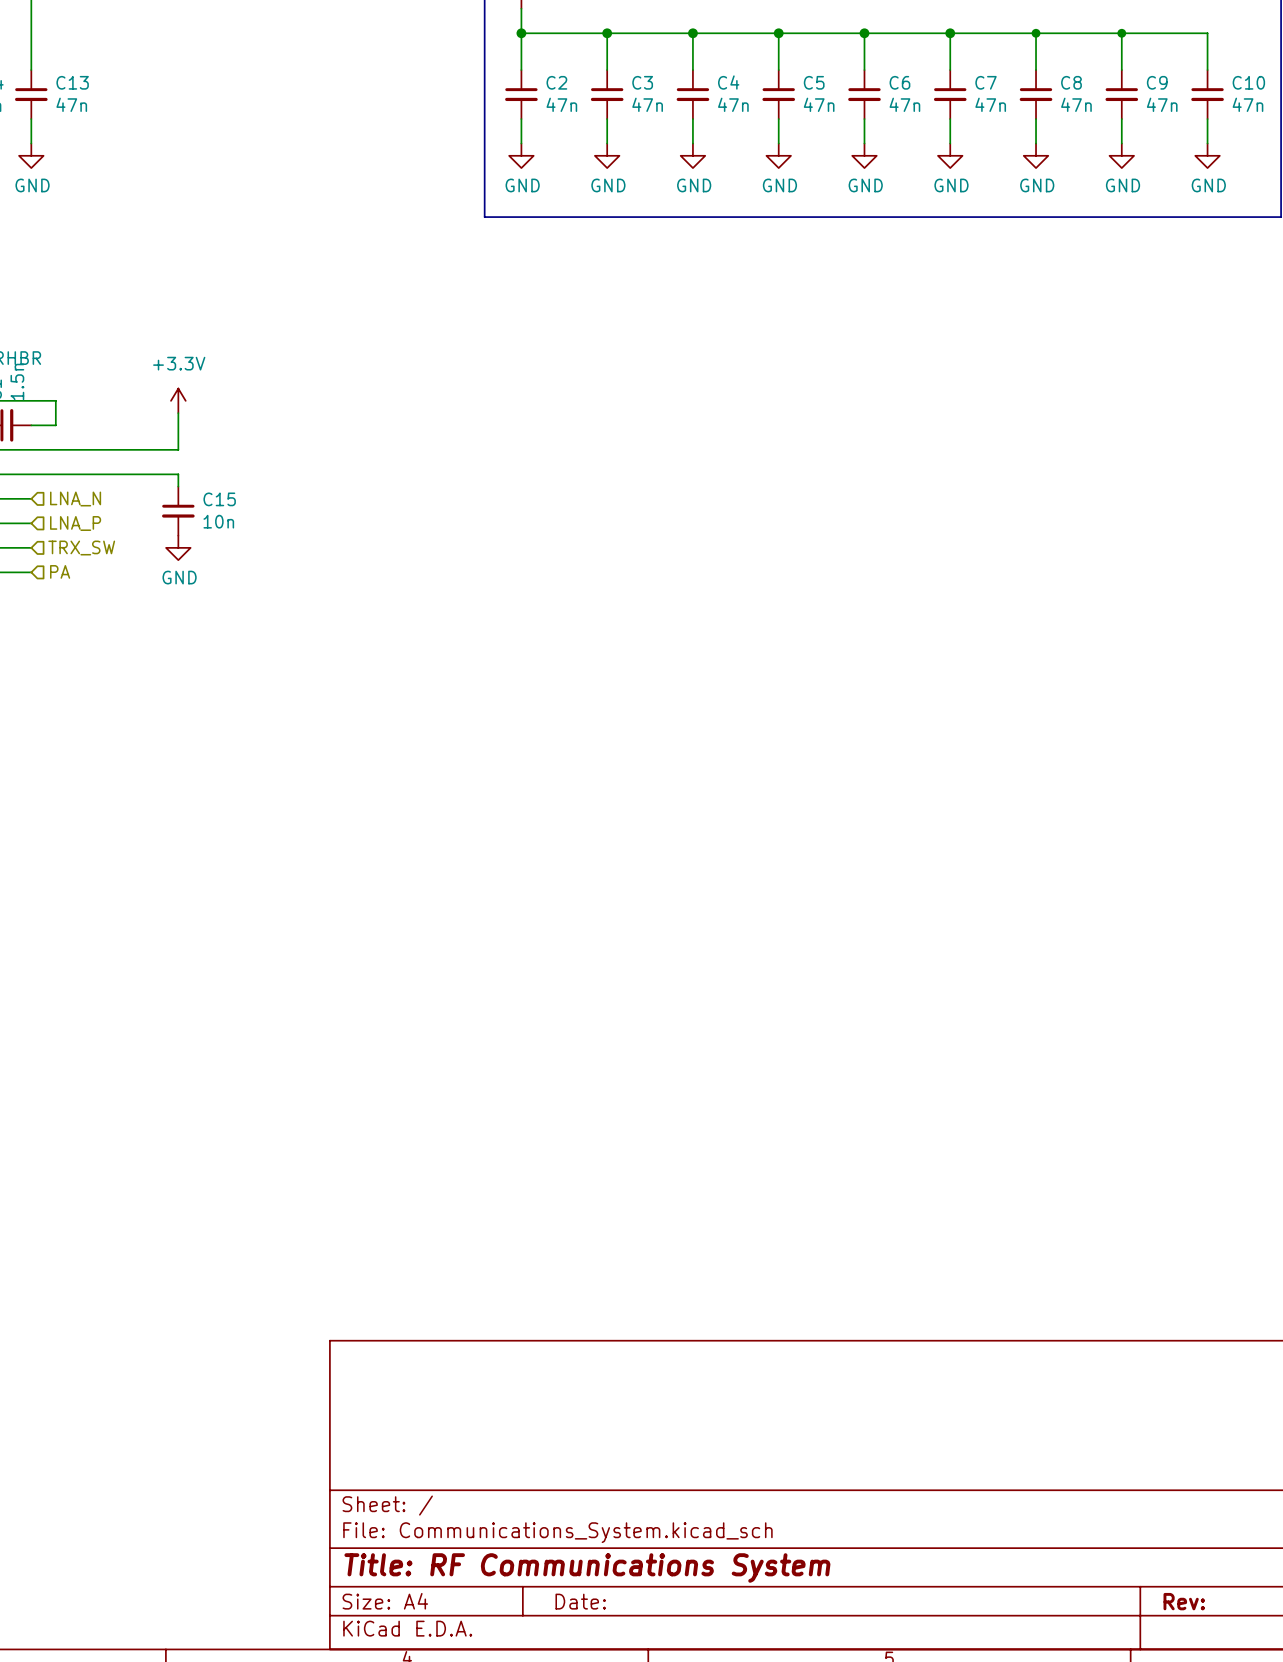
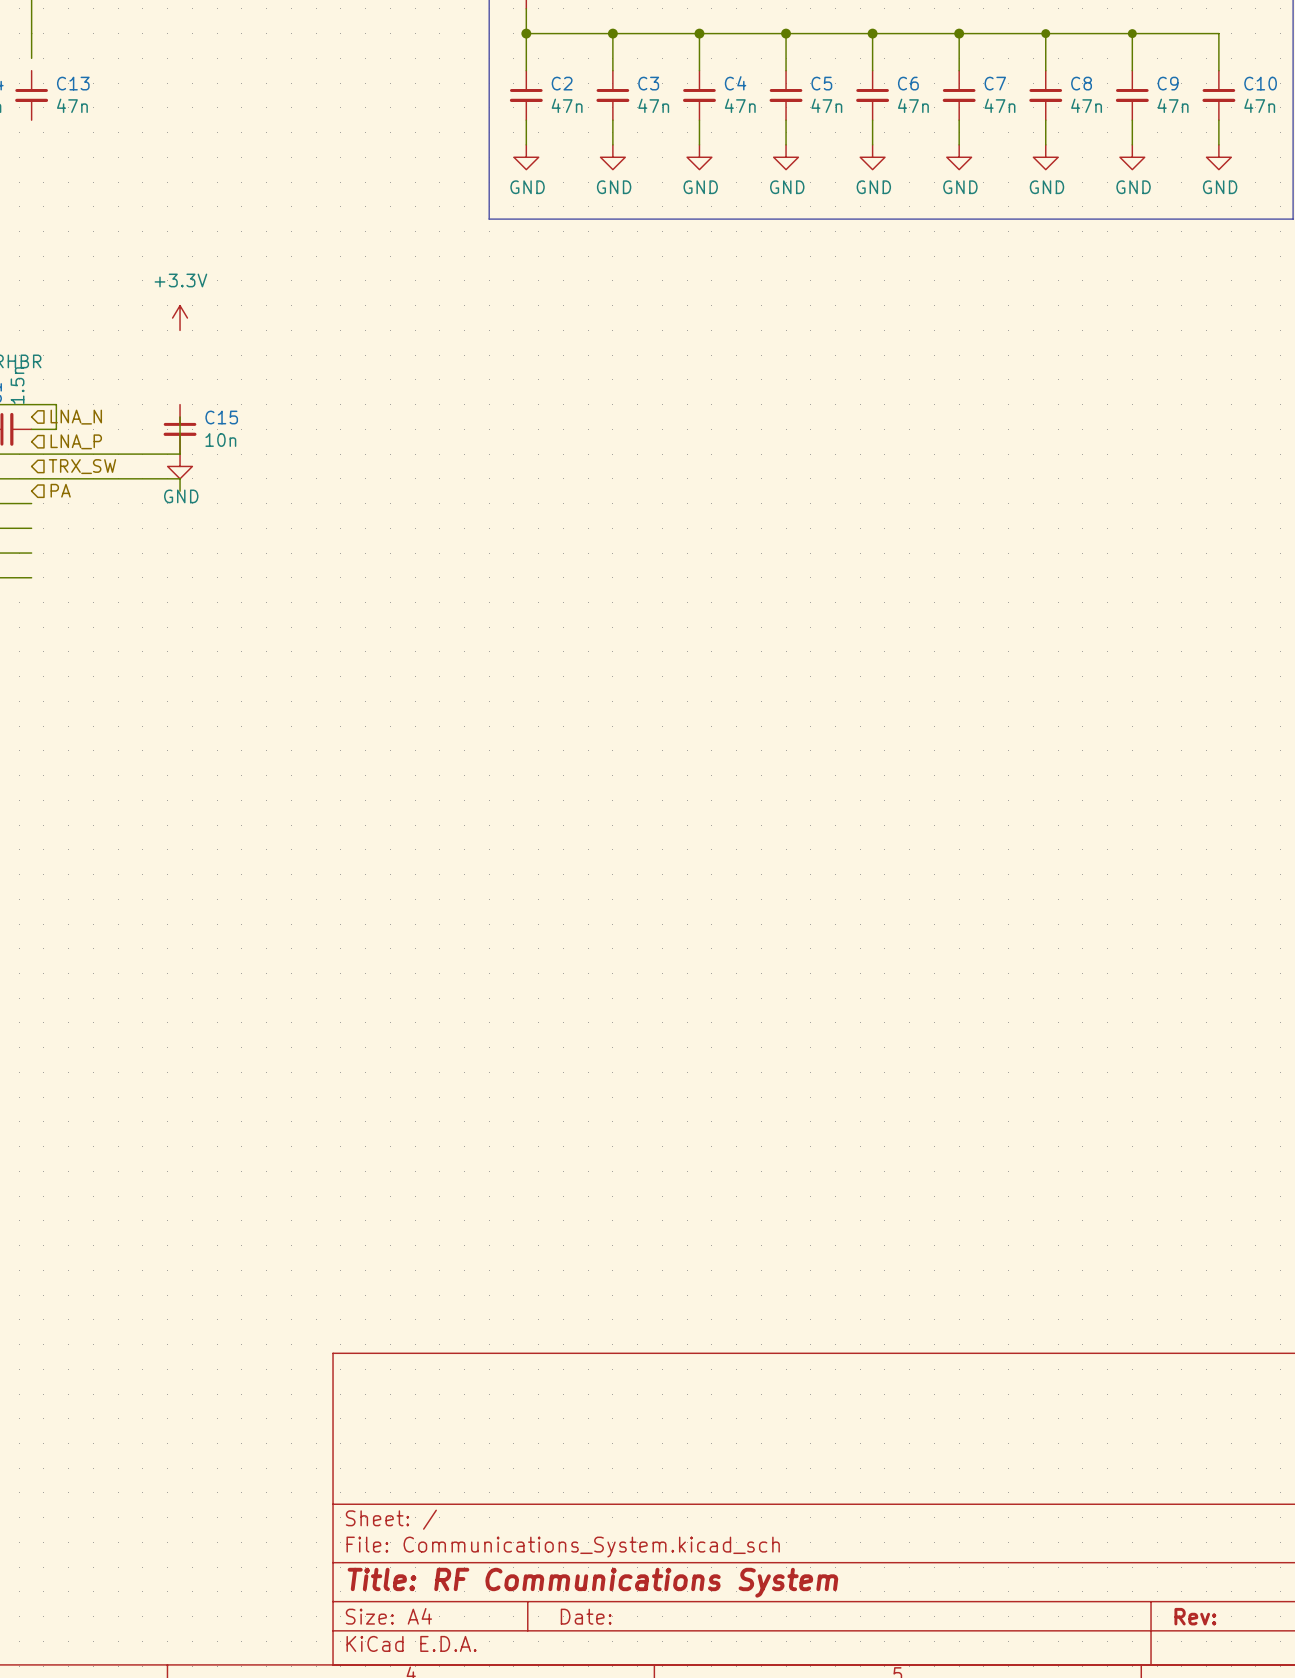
wire: (31, 57) (31, 70) -> none
wire: (31, 119) (31, 143) -> none
power symbol: GND (31, 155) -> none
power symbol position: +3.3V (178, 400) -> +3.3V (180, 318)
hierarchical label position: LNA_N (75, 498) -> LNA_N (76, 417)
C15 position: (178, 511) -> (180, 429)
hierarchical label position: LNA_P (75, 523) -> LNA_P (76, 441)
power symbol position: GND (178, 547) -> GND (180, 466)
hierarchical label position: TRX_SW (81, 548) -> TRX_SW (82, 466)
hierarchical label position: PA (60, 571) -> PA (60, 490)

